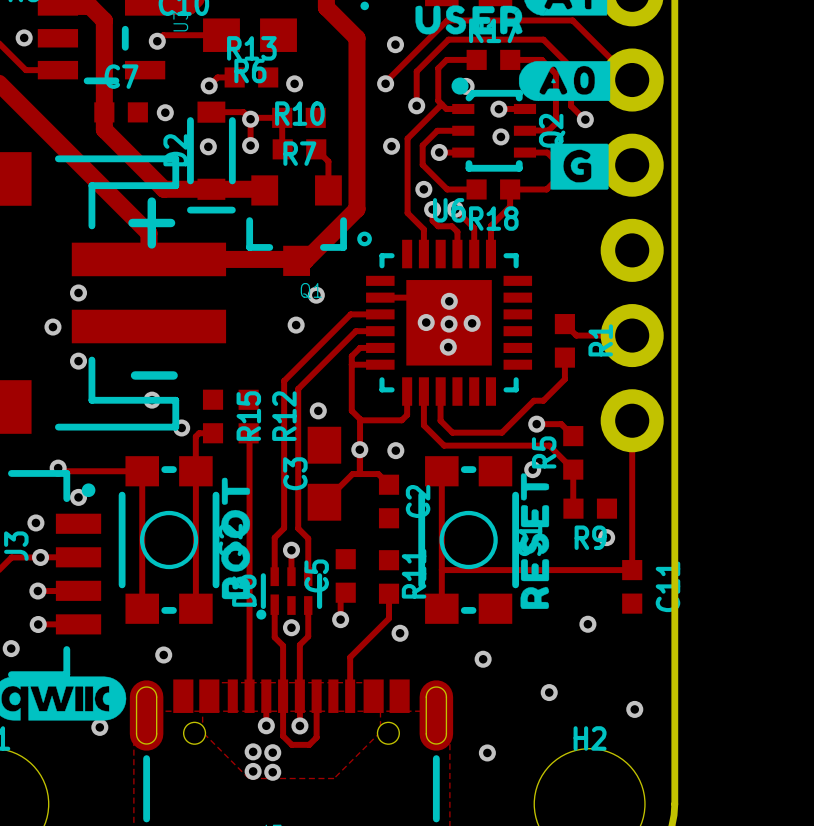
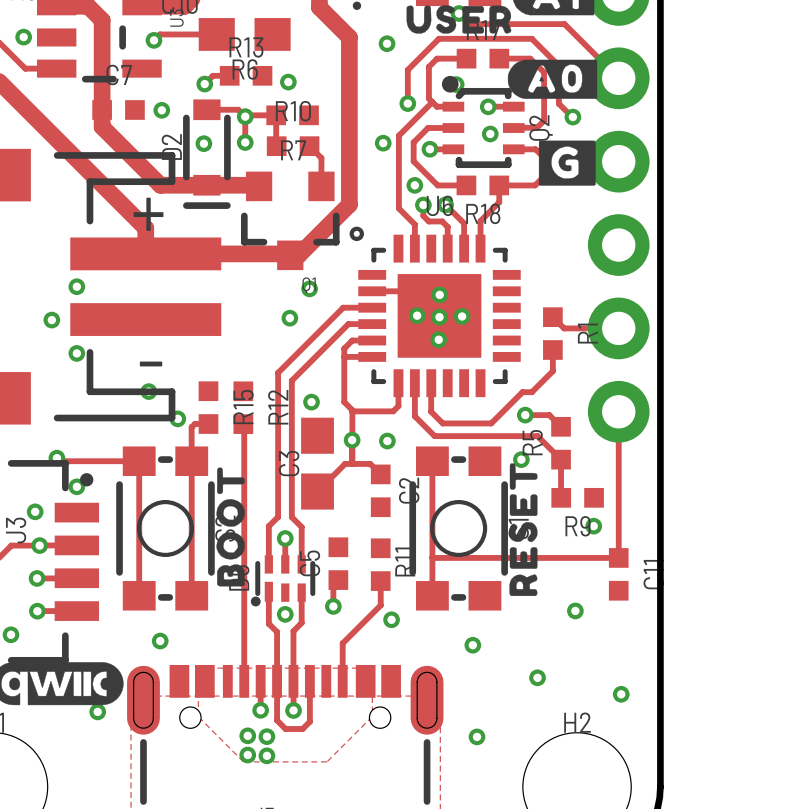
track: (576, 24) (572, 20) (447, 20) (385, 83) -> (564, 24) (469, 24) (459, 13)
via position: (385, 83) -> (459, 13)

